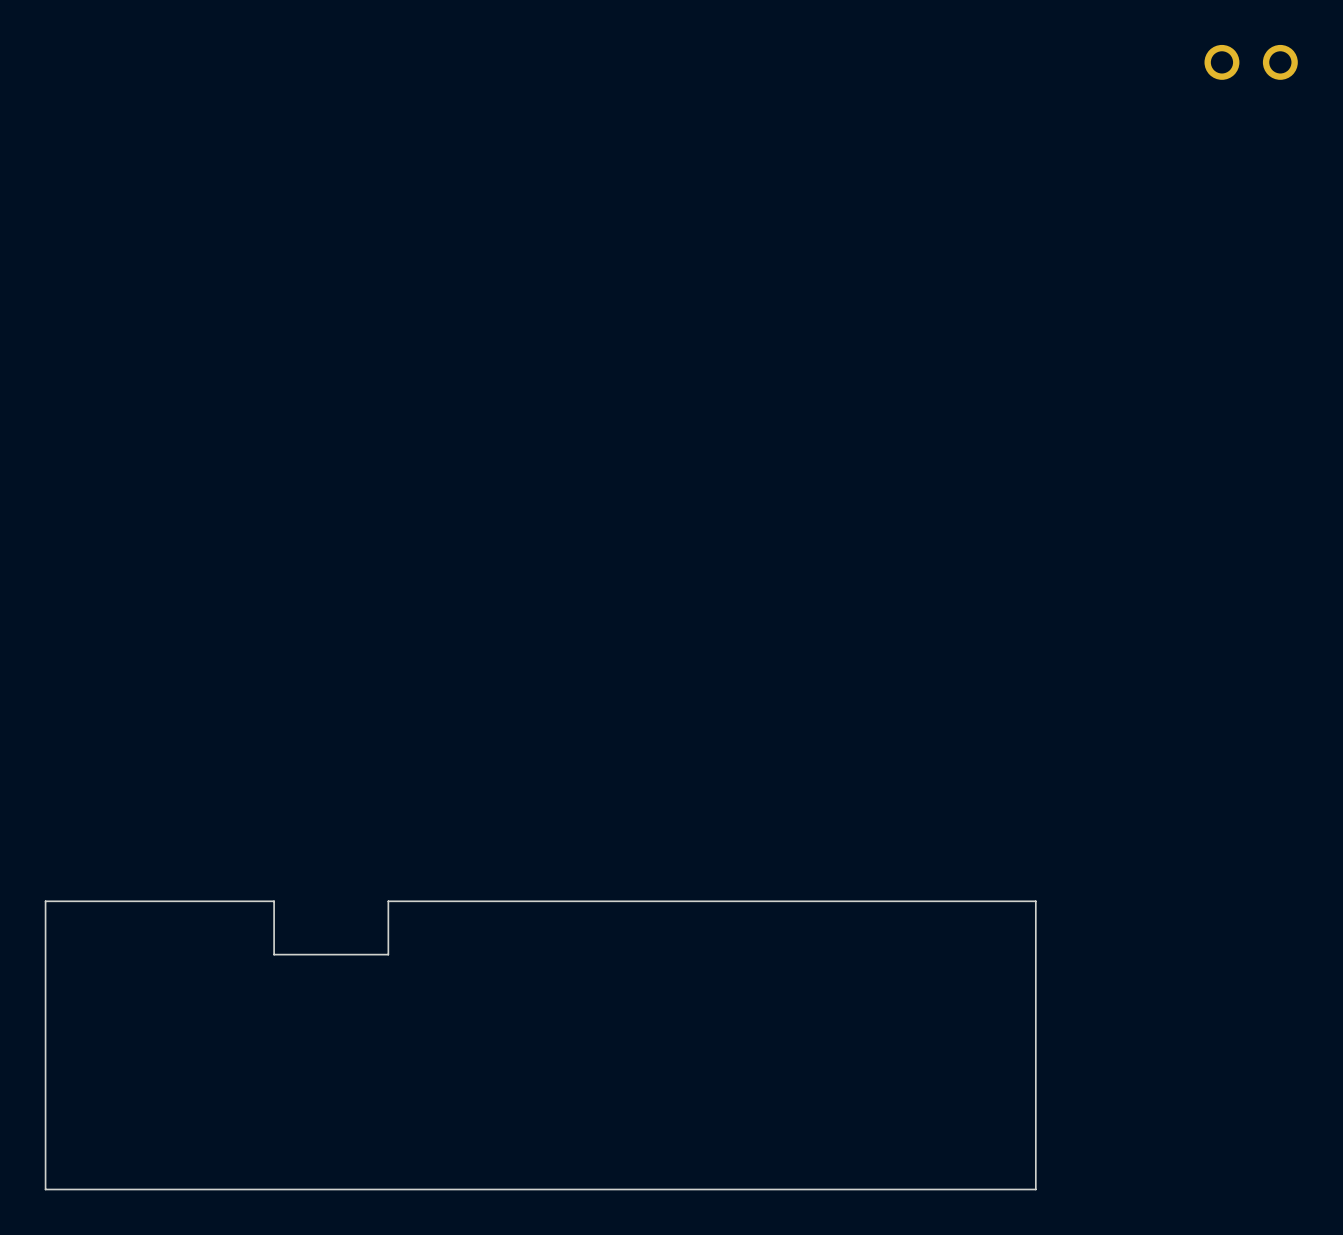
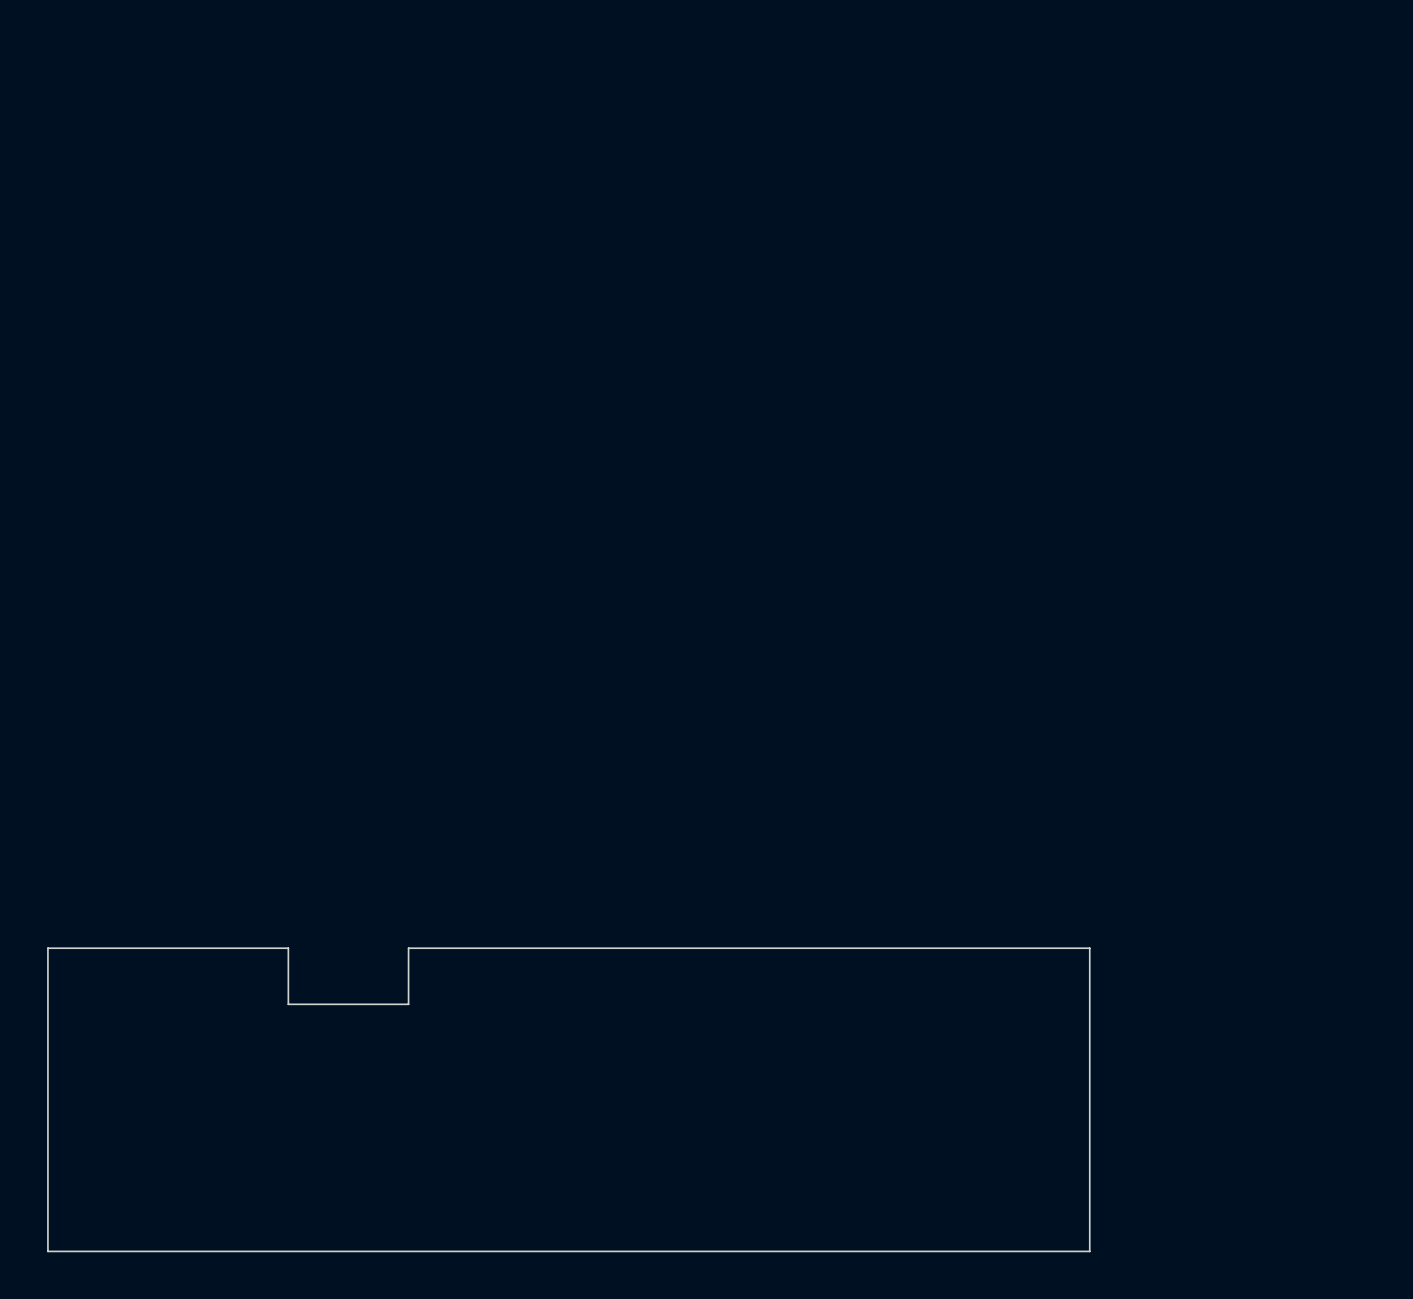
part: (1251, 62) -> none

